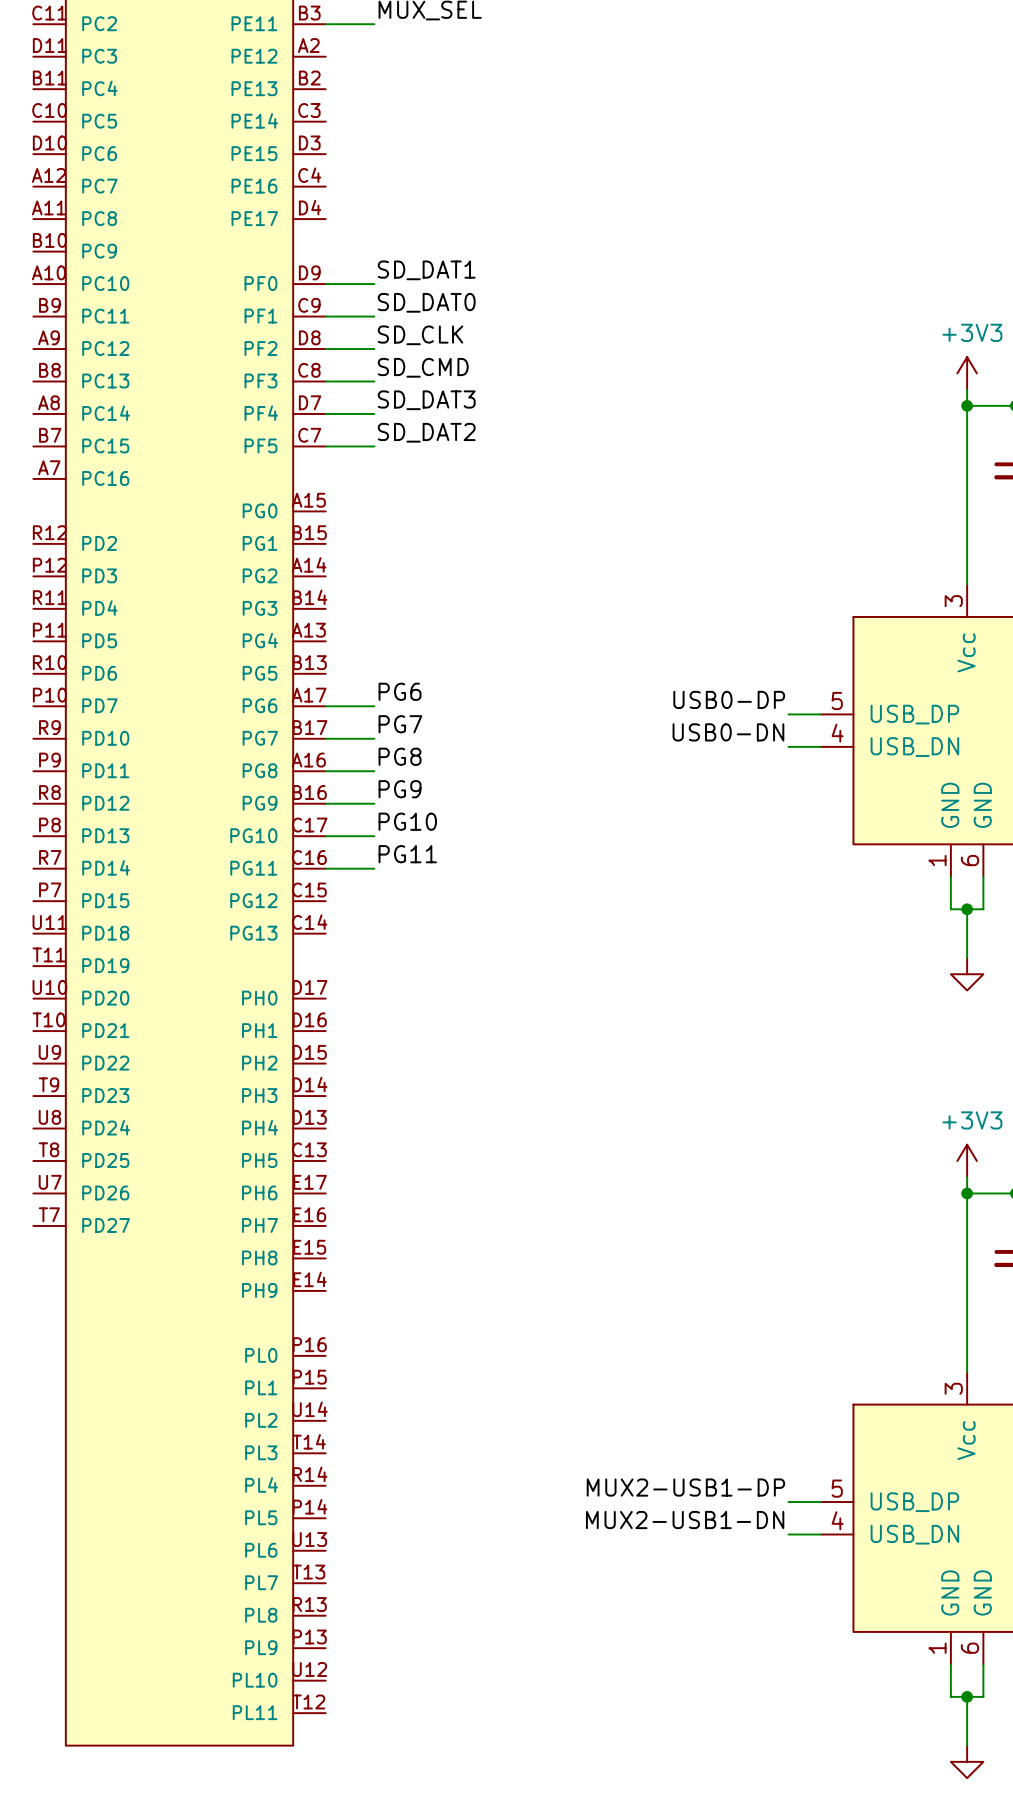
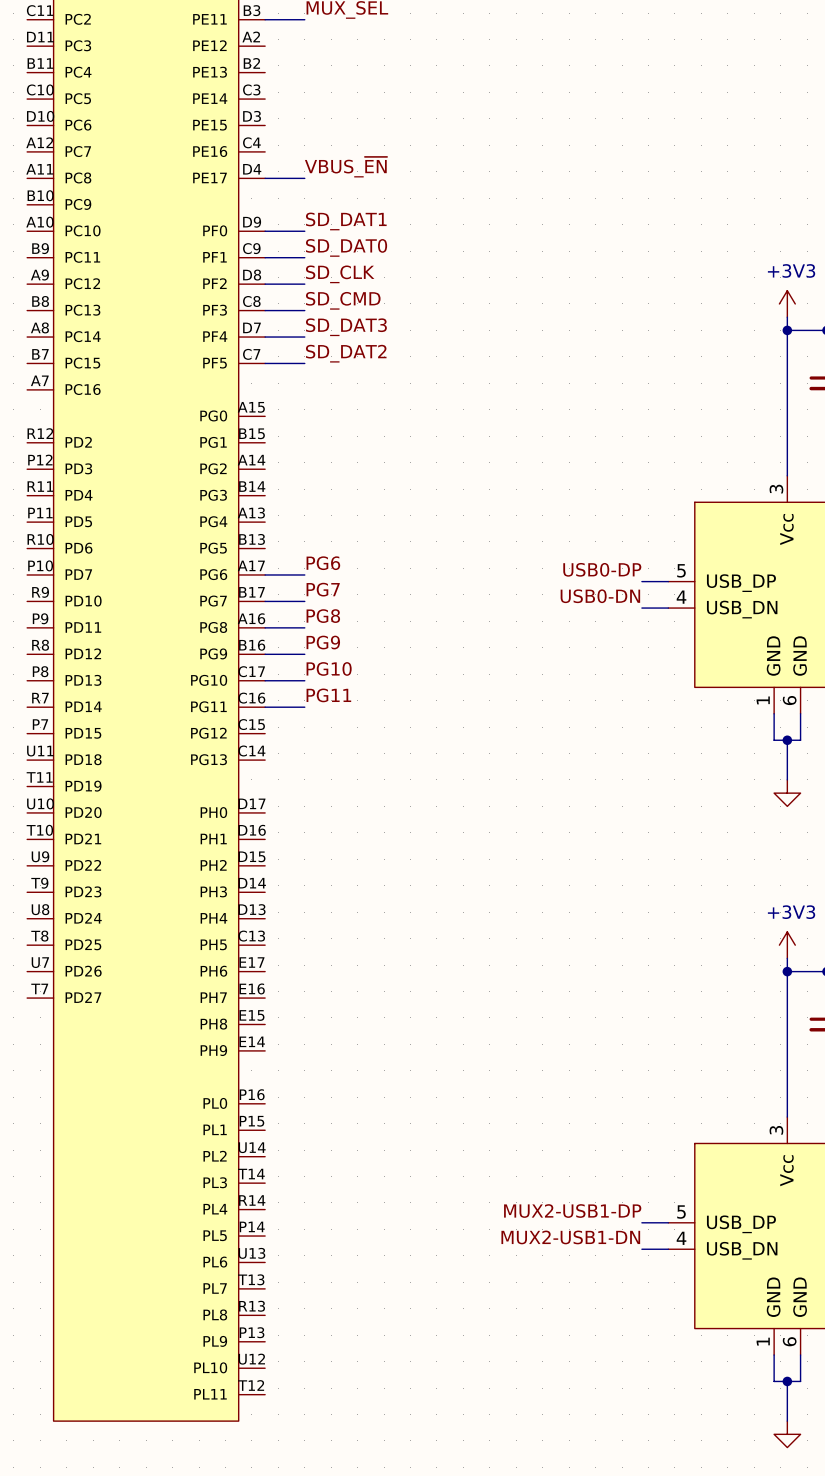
label: none -> VBUS_~{EN} (346, 167)
wire: none -> (265, 178) (304, 178)

